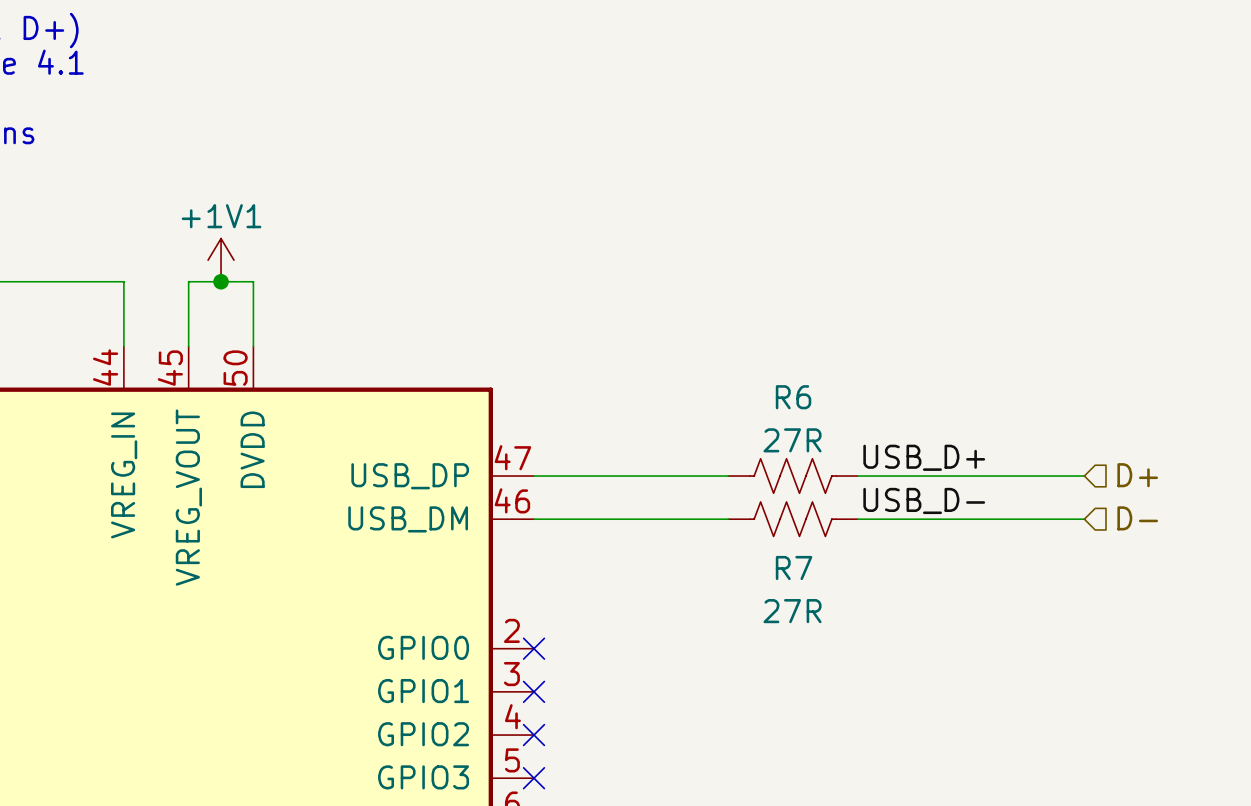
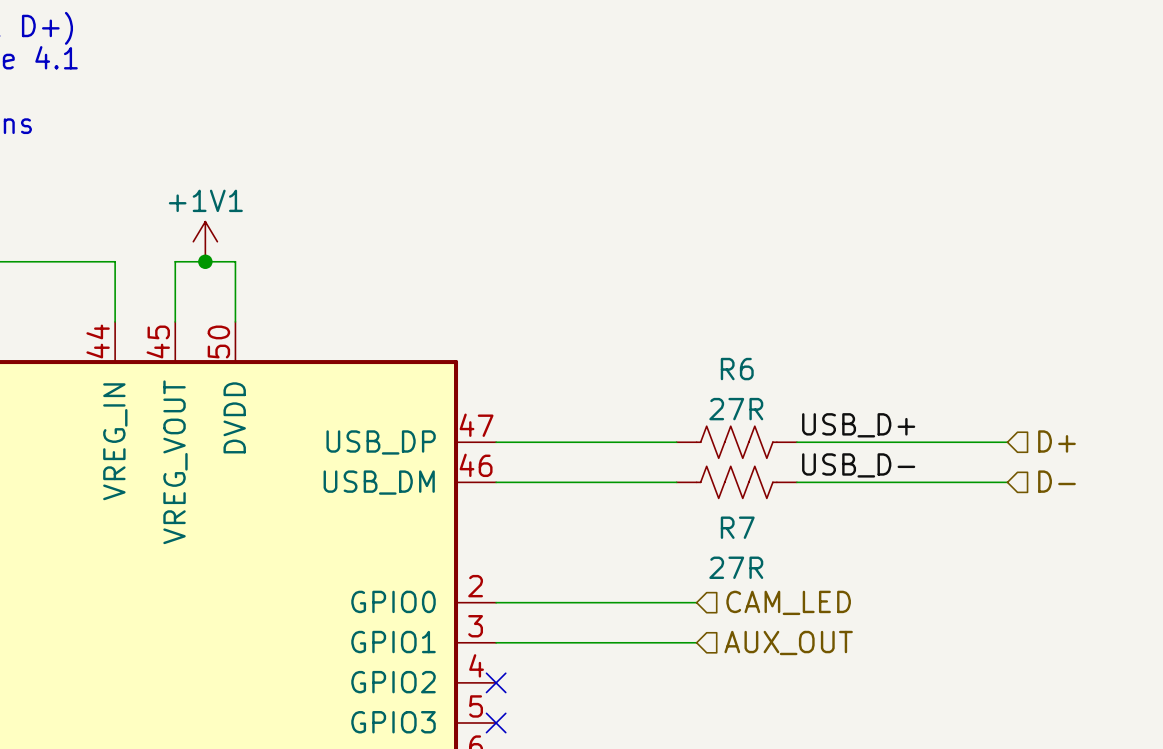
wire: none -> (496, 602) (696, 602)
no-connect mark: (534, 648) -> none
hierarchical label: none -> CAM_LED (788, 602)
wire: none -> (496, 642) (696, 642)
no-connect mark: (534, 691) -> none
hierarchical label: none -> AUX_OUT (788, 642)

